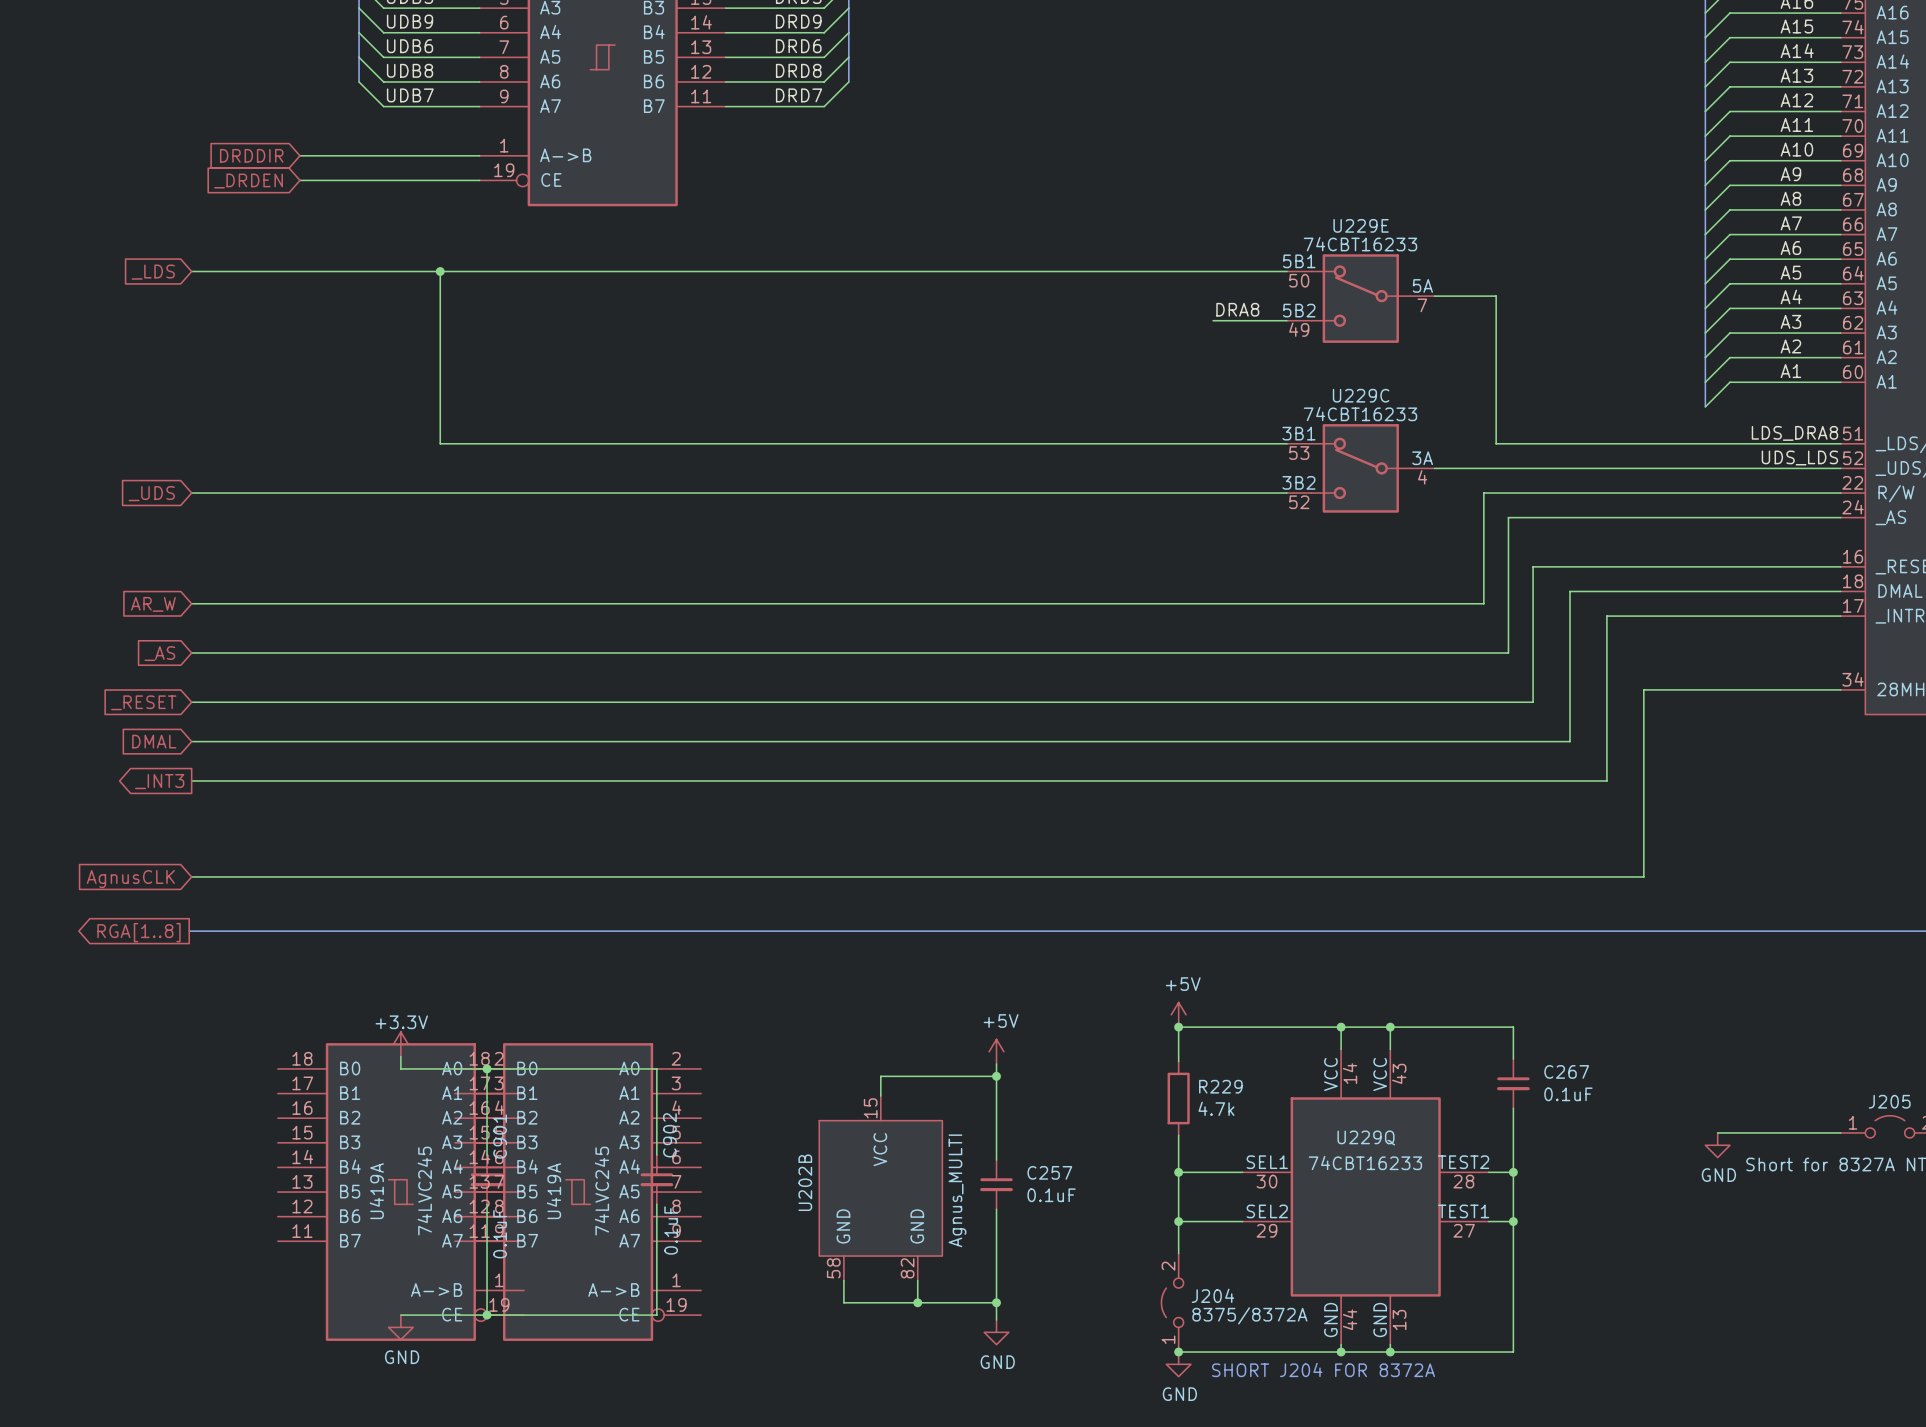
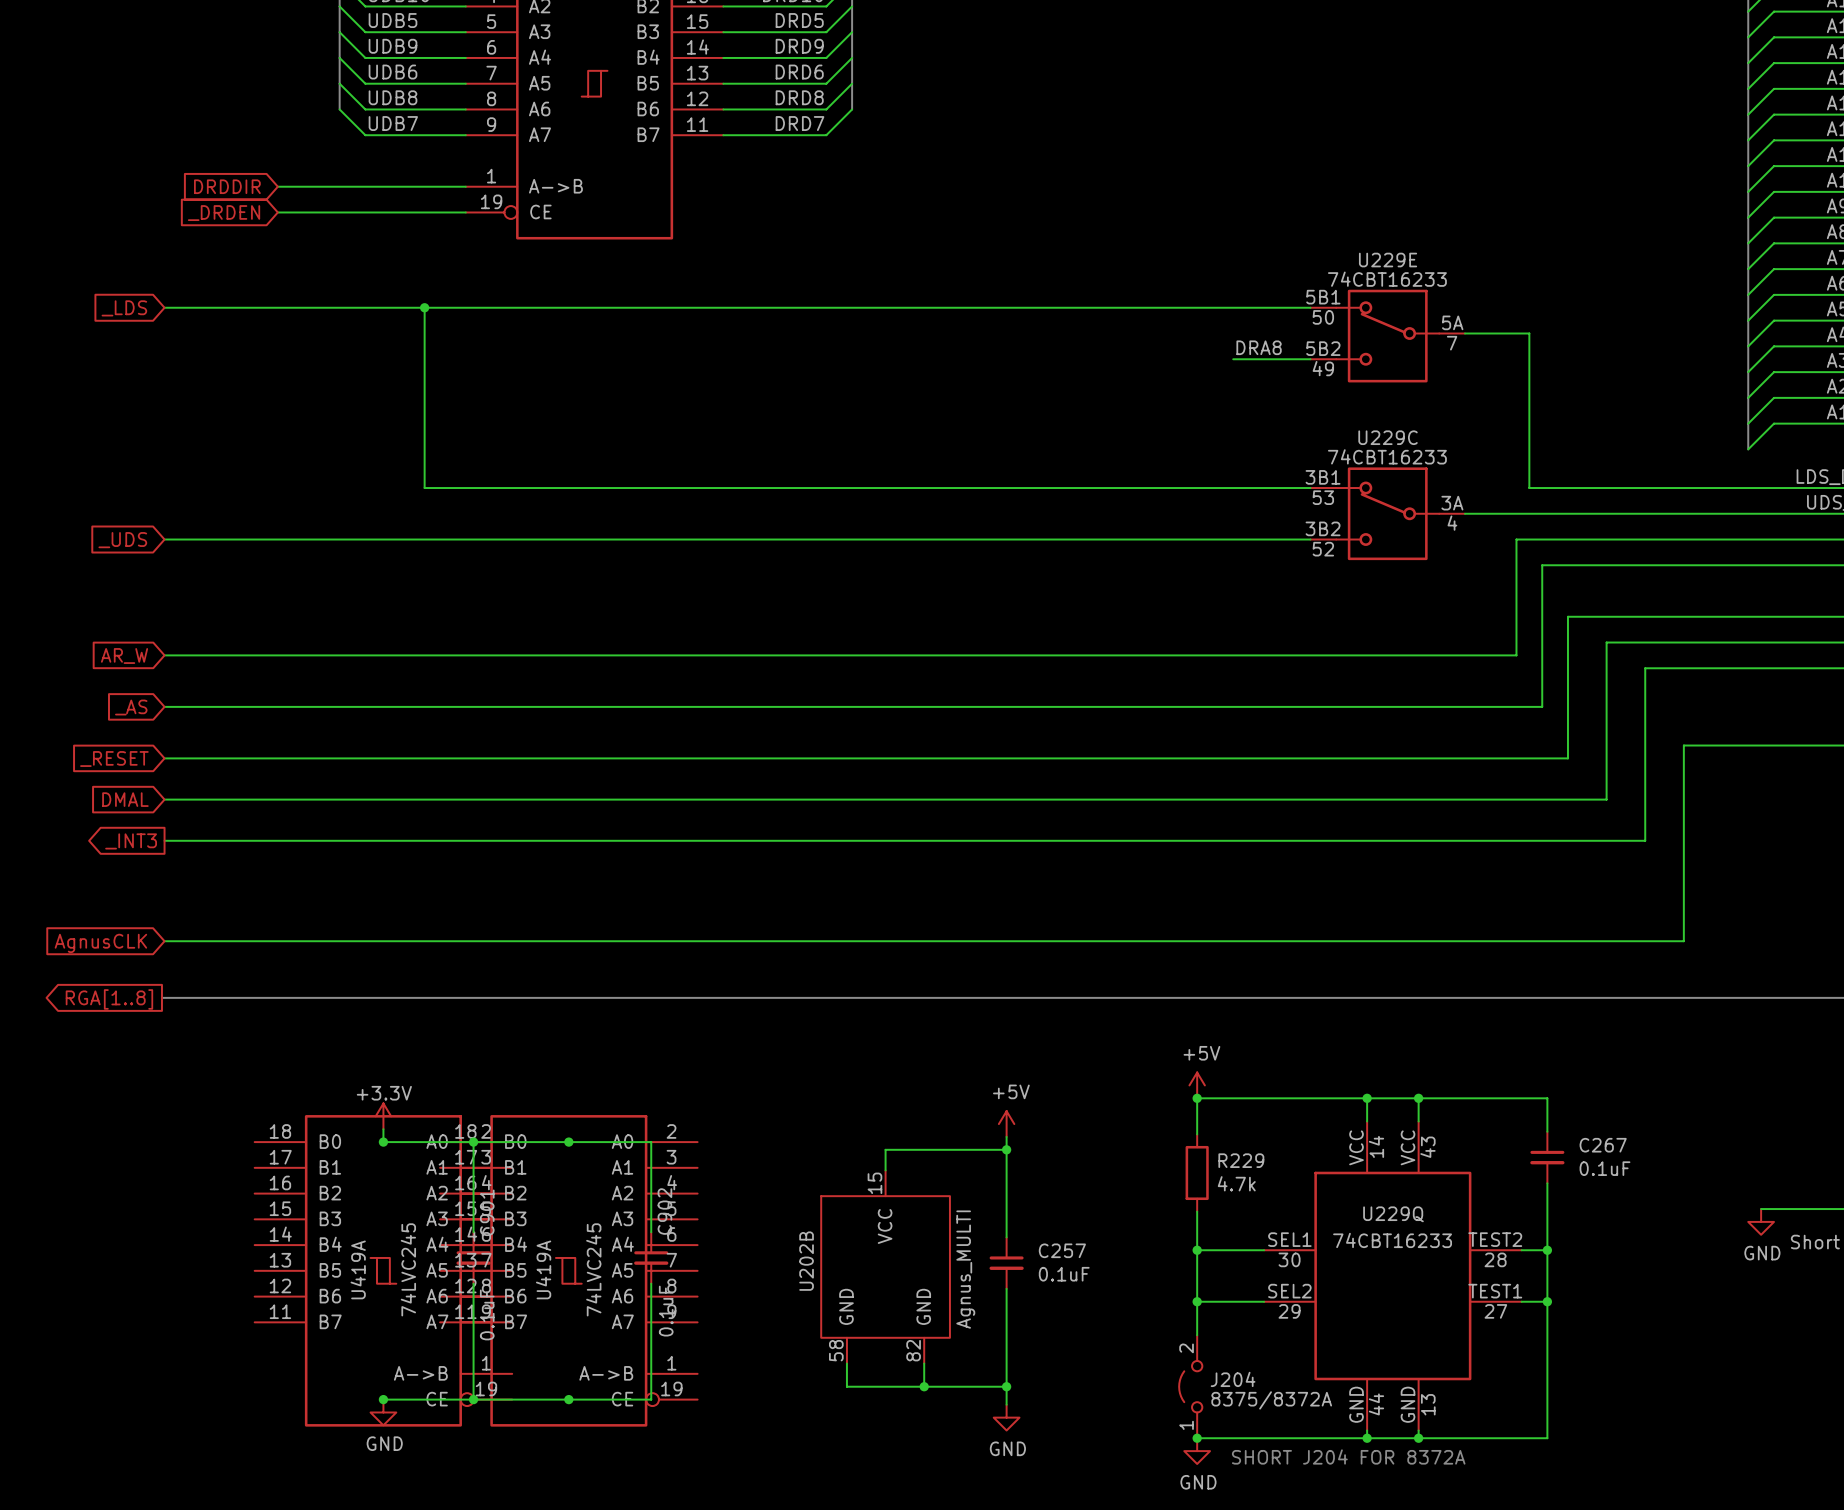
junction: none -> (383, 1142)
junction: none -> (568, 1142)
junction: none -> (383, 1399)
junction: none -> (568, 1399)

